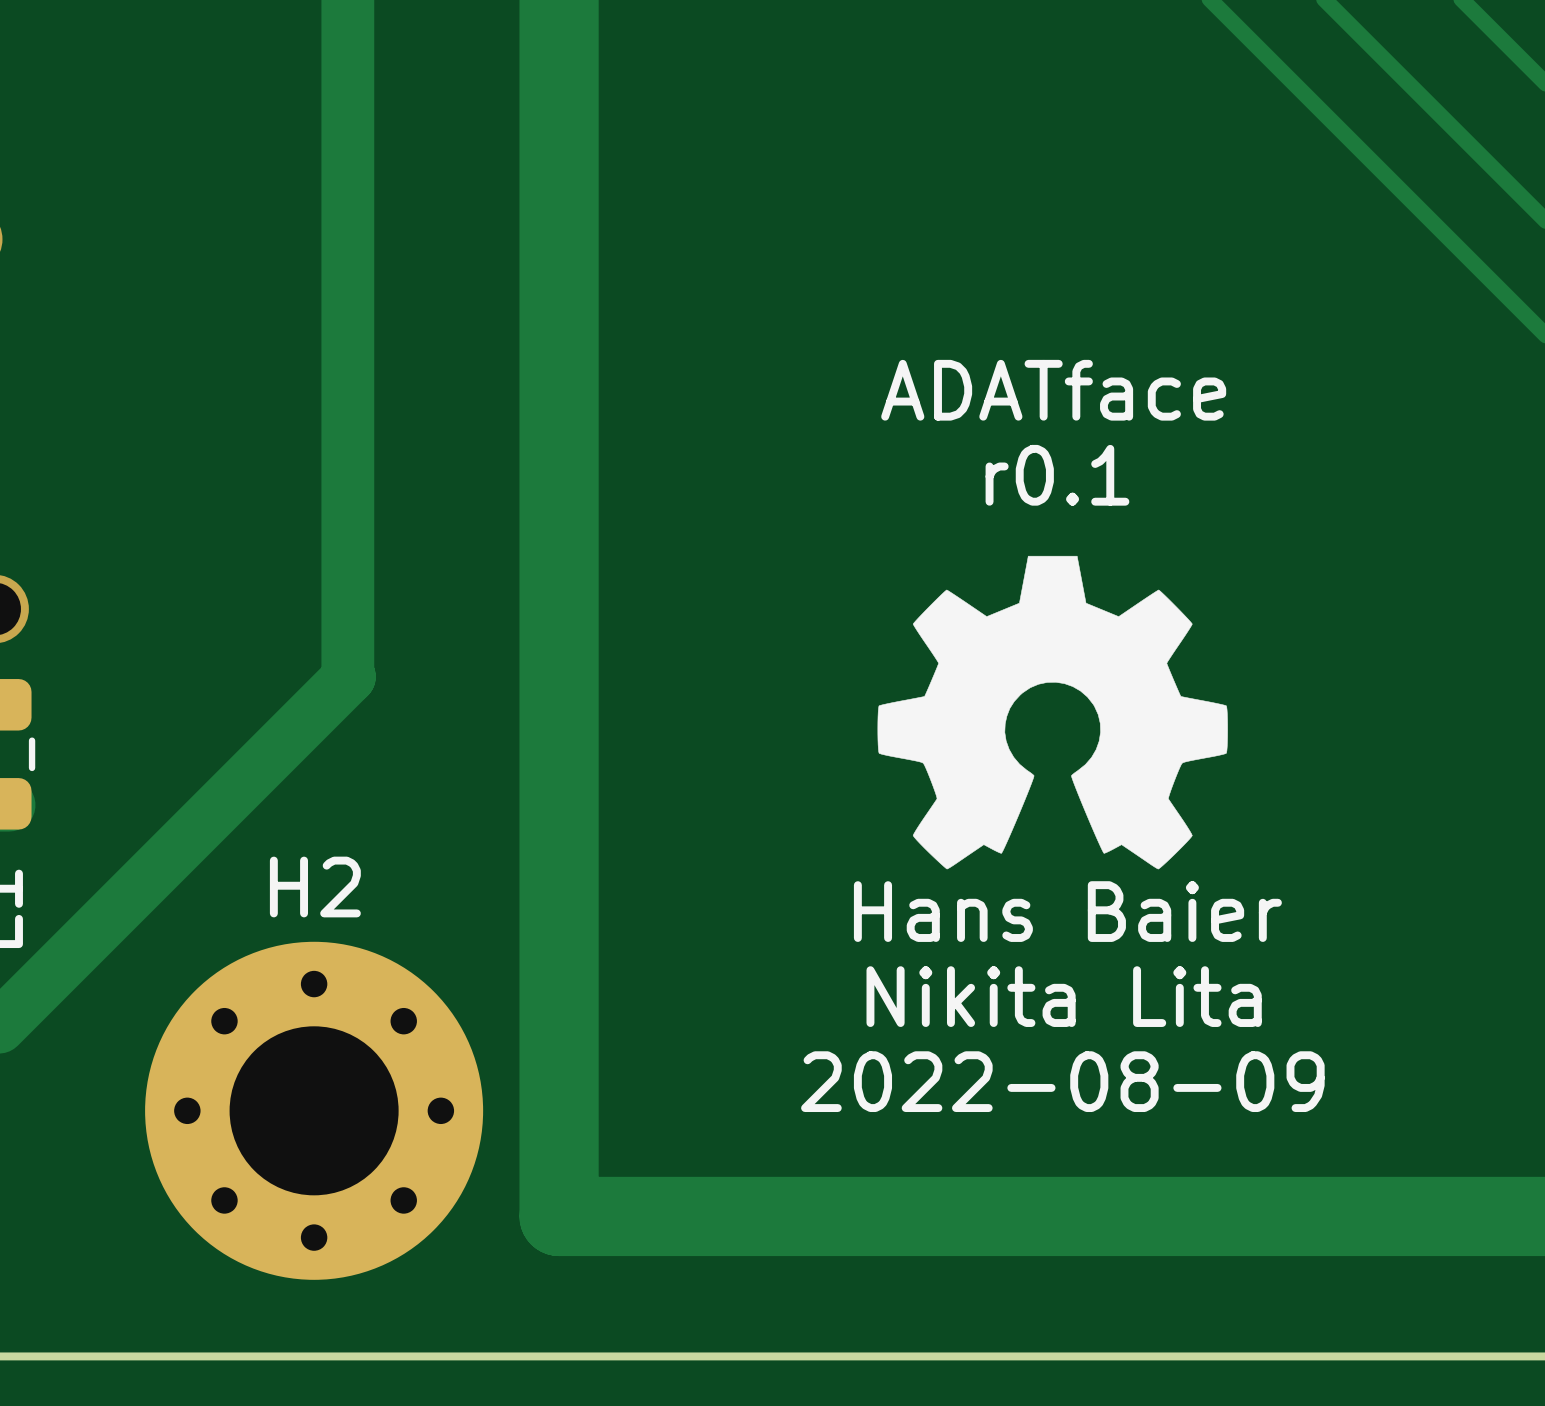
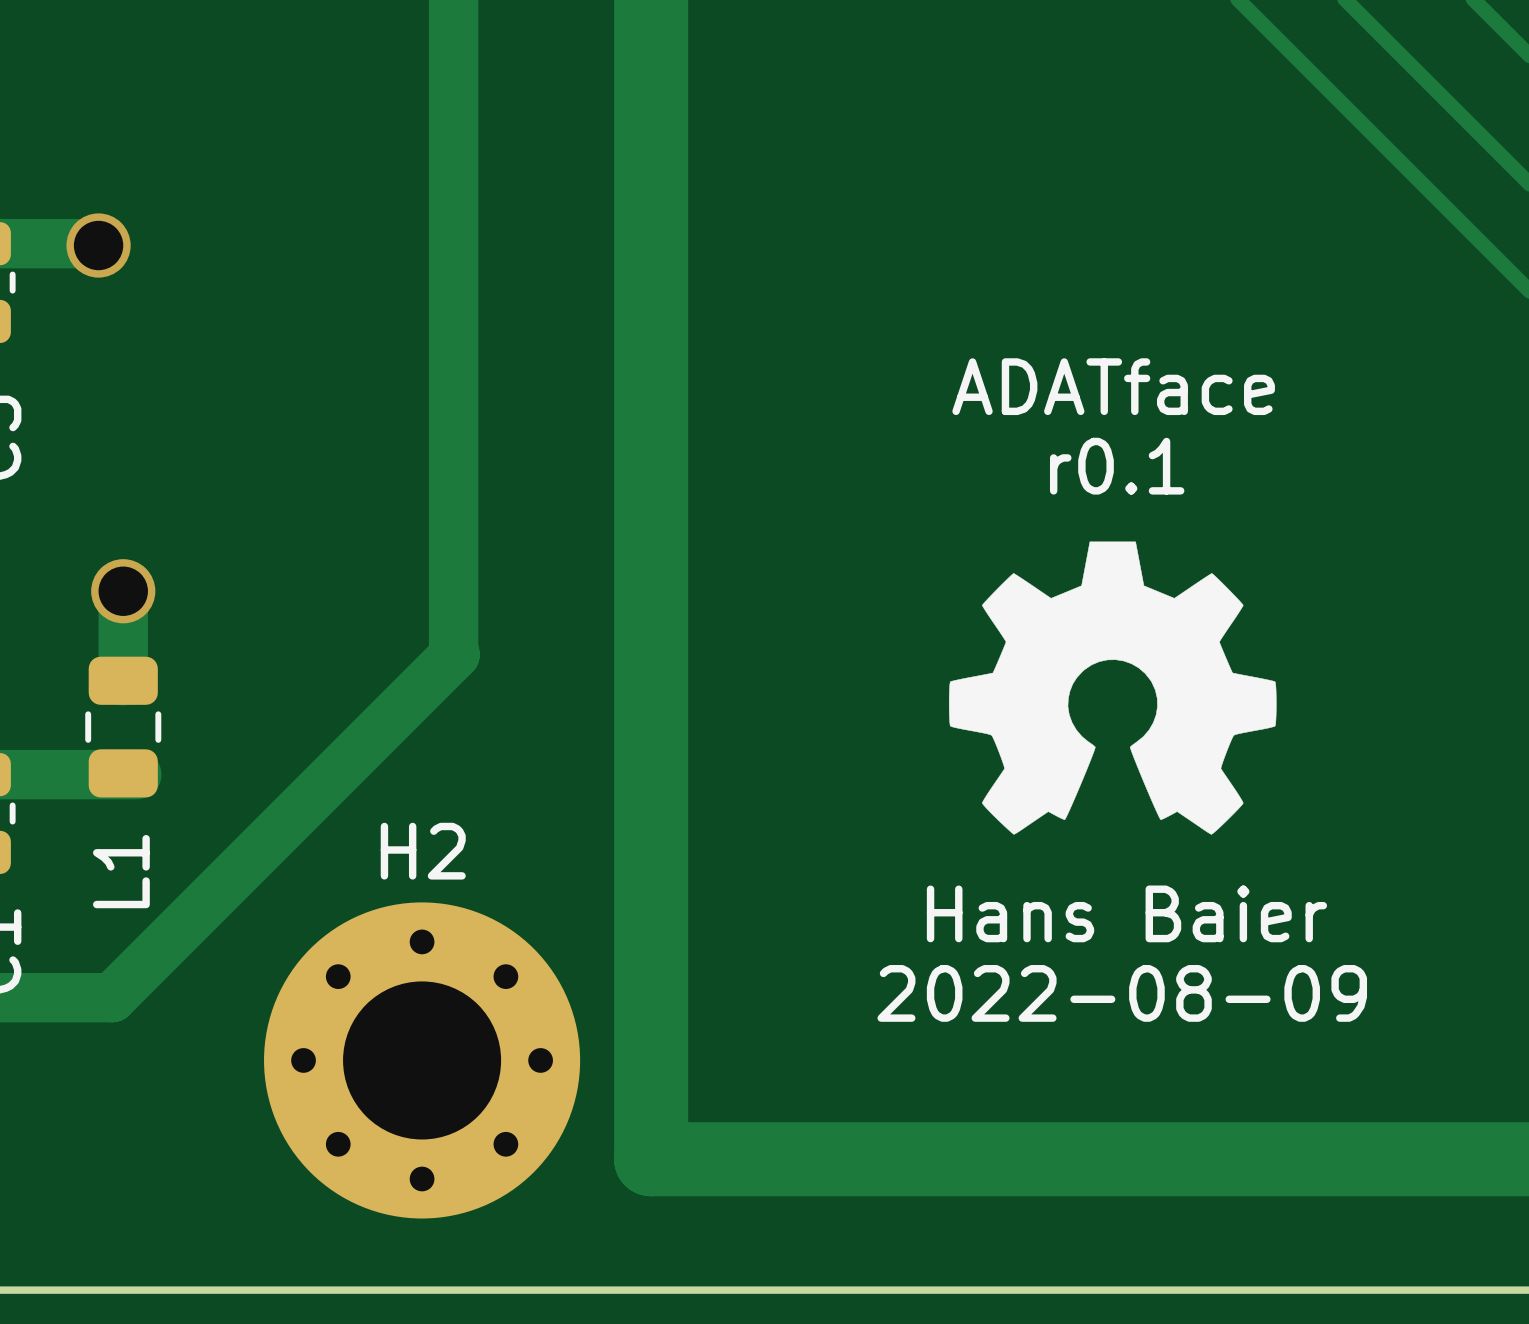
text position: Hans Baier (1067, 911) -> Hans Baier (1126, 913)
text: Nikita Lita (1064, 996) -> none
text position: 2022-08-09 (1062, 1081) -> 2022-08-09 (1122, 993)

